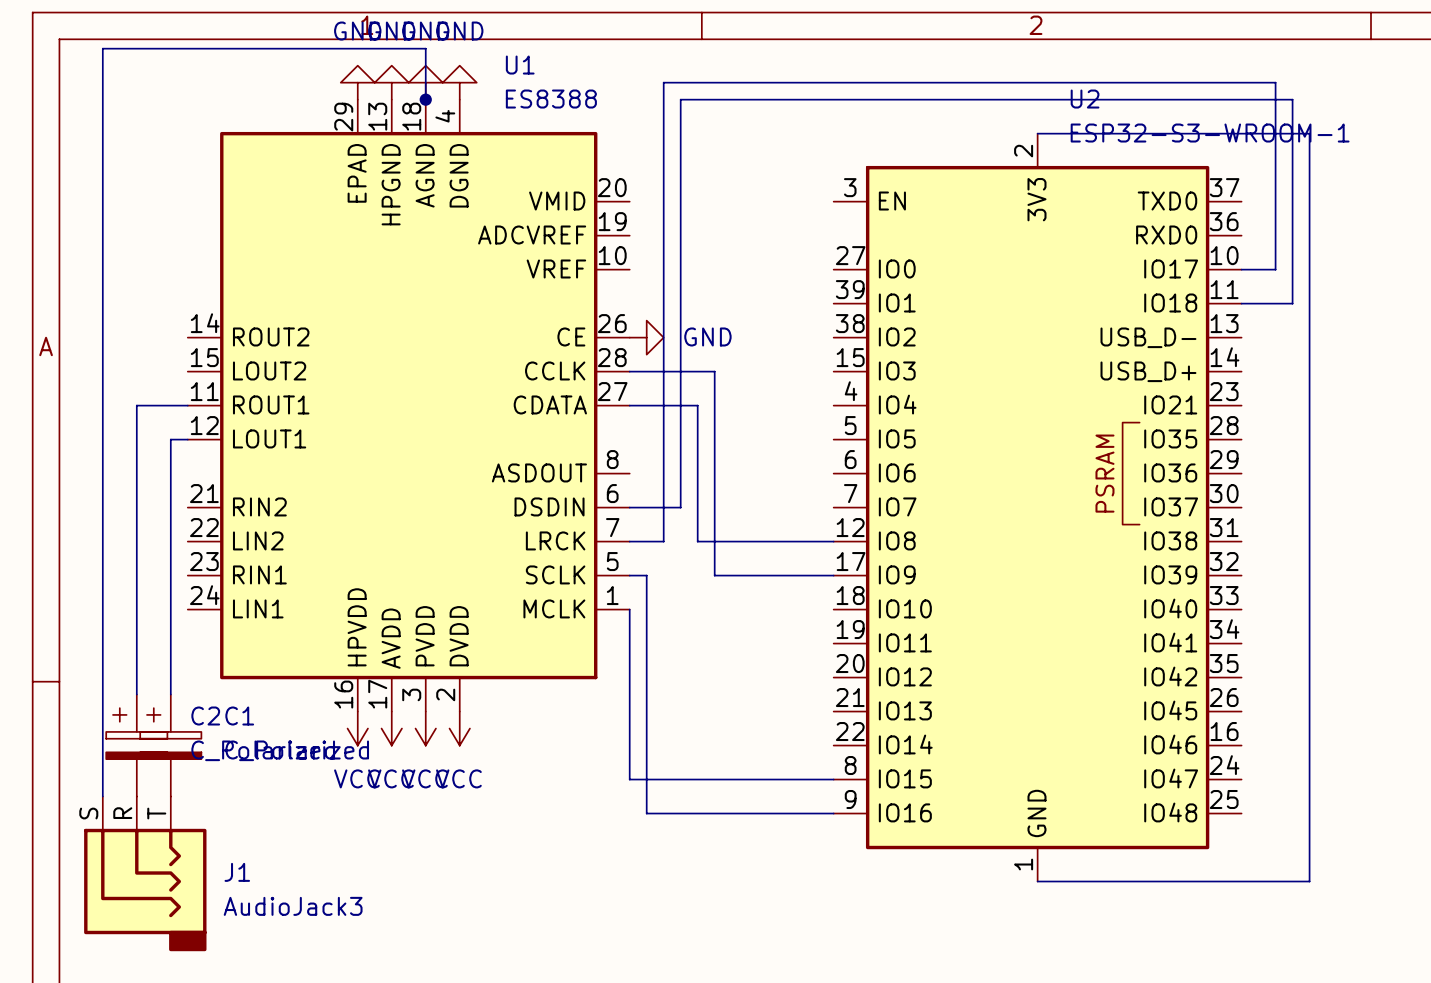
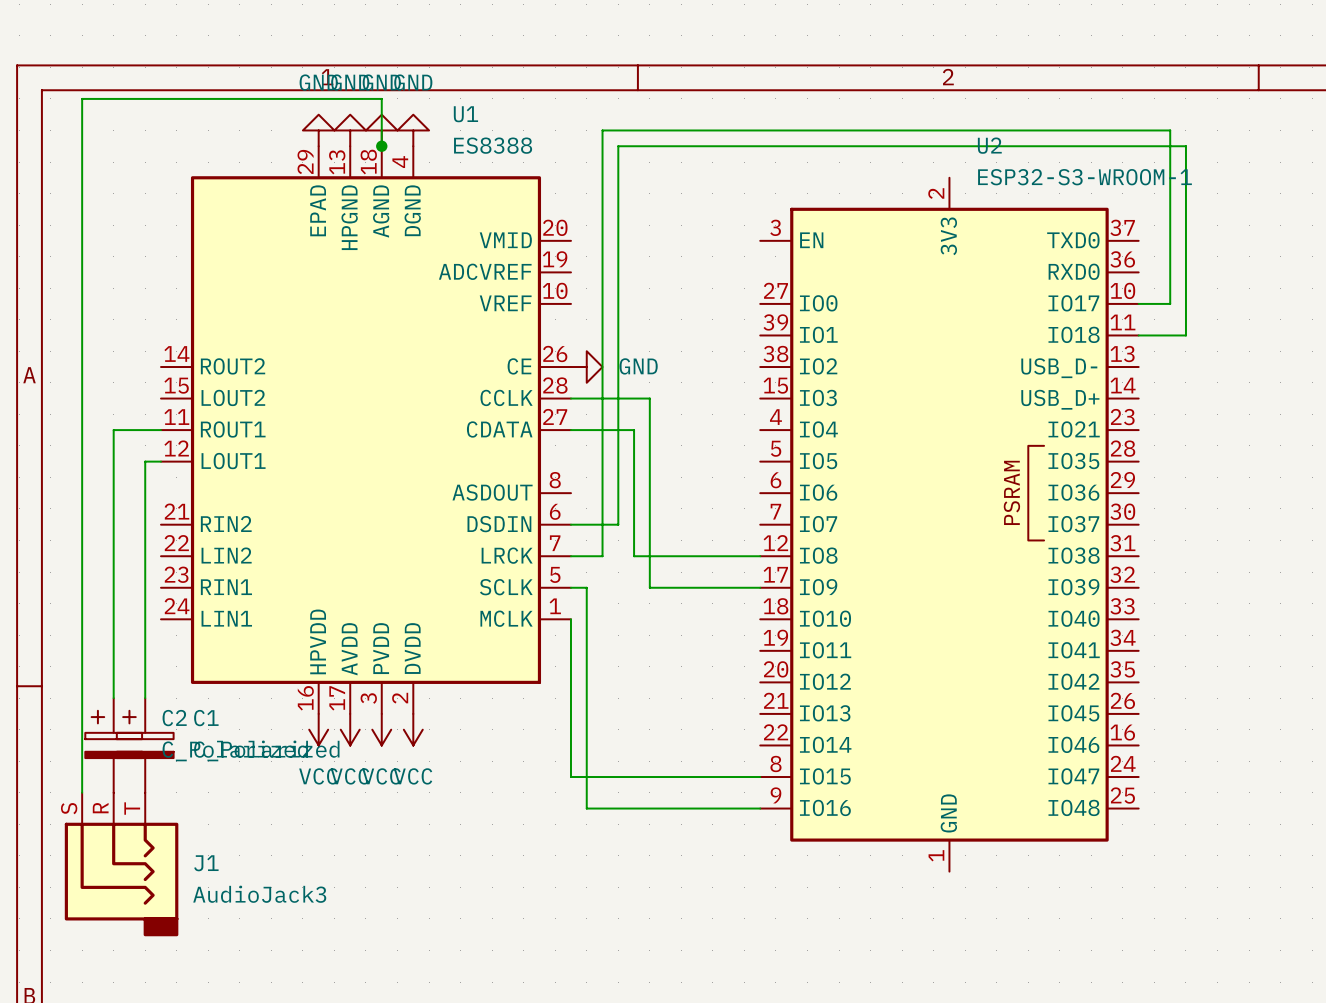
wire: (1037, 133) (1309, 133) (1309, 881) (1037, 881) -> none

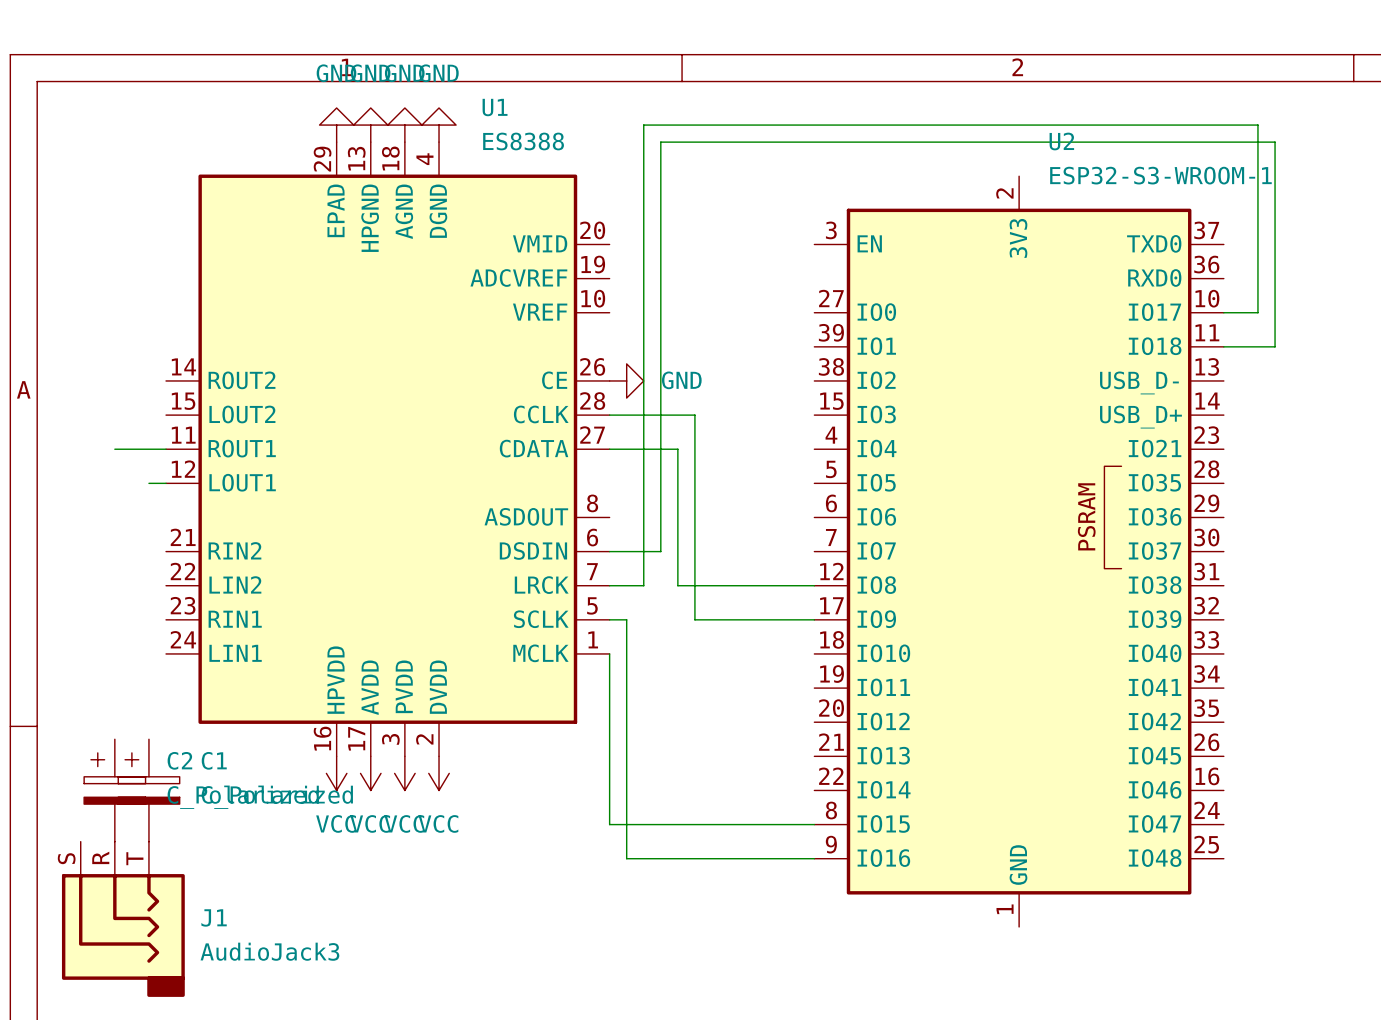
wire: (381, 146) (381, 98) (82, 98) (82, 792) -> none
junction: (381, 146) -> none
wire: (113, 430) (113, 698) -> none
wire: (145, 461) (145, 698) -> none

